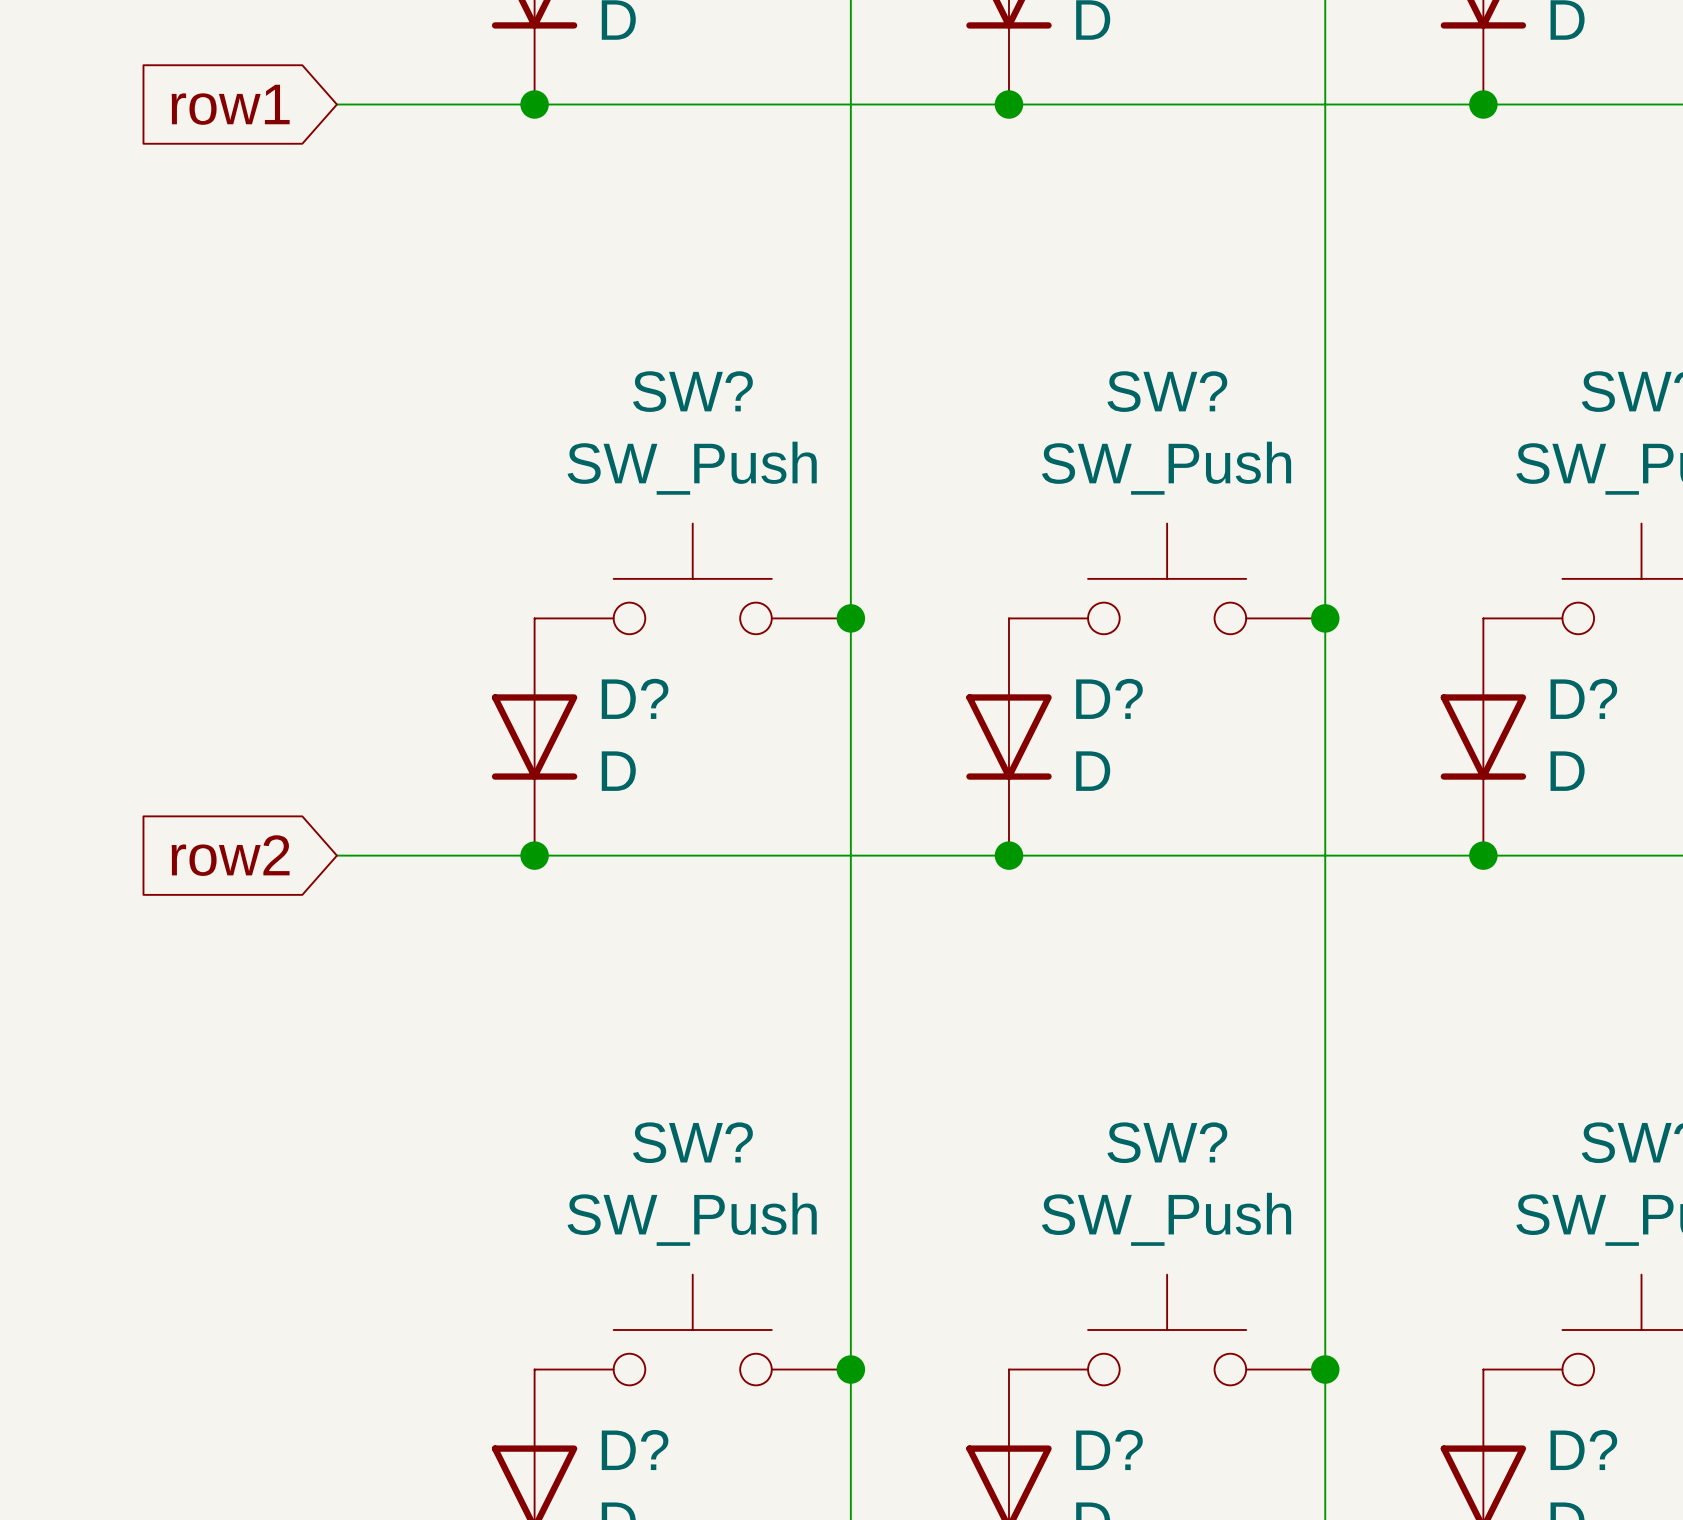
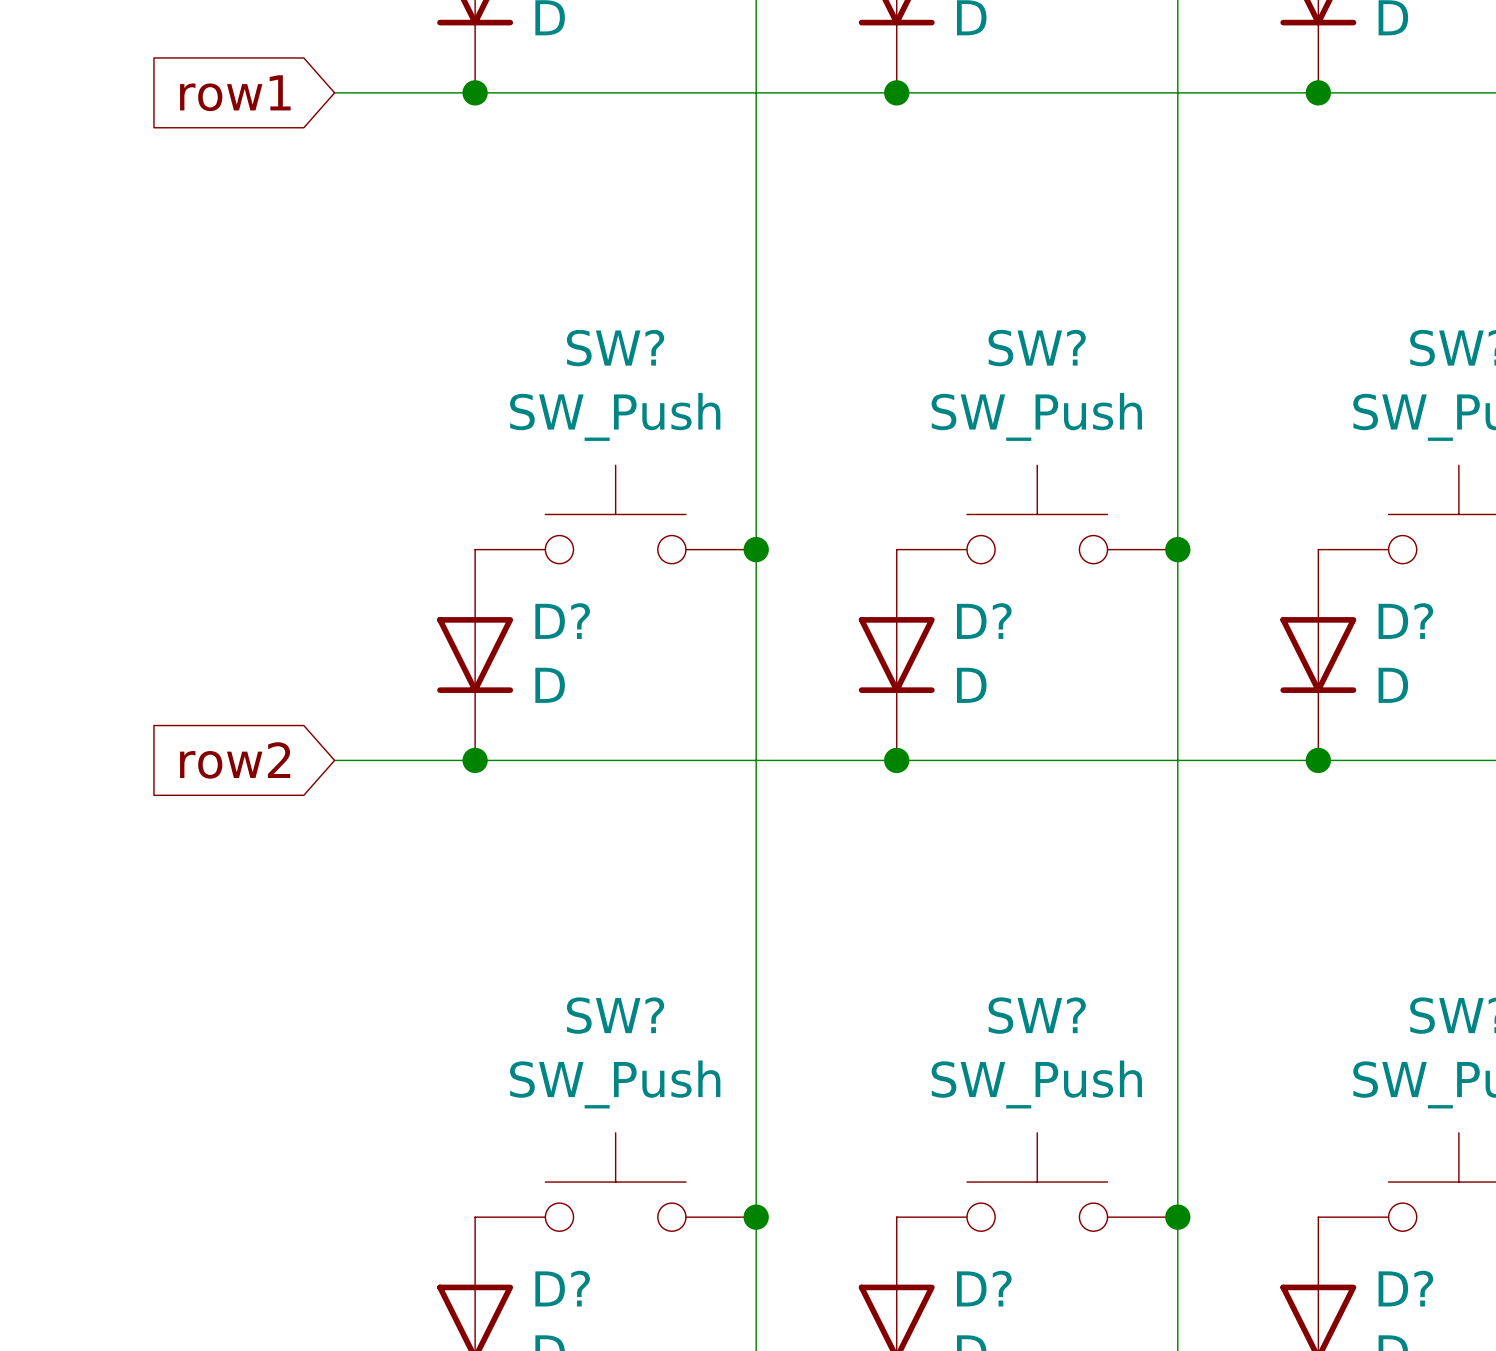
global label position: row1 (230, 104) -> row1 (235, 93)
wire: (336, 104) (376, 104) -> none
global label position: row2 (230, 855) -> row2 (235, 760)
wire: (336, 855) (376, 855) -> none

